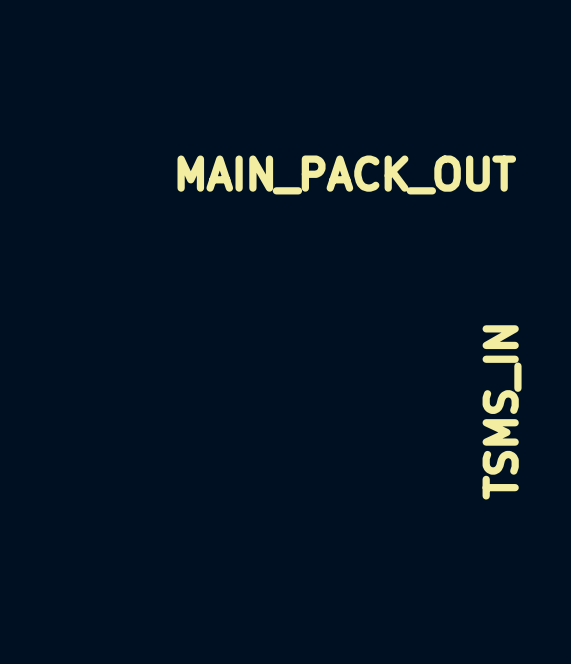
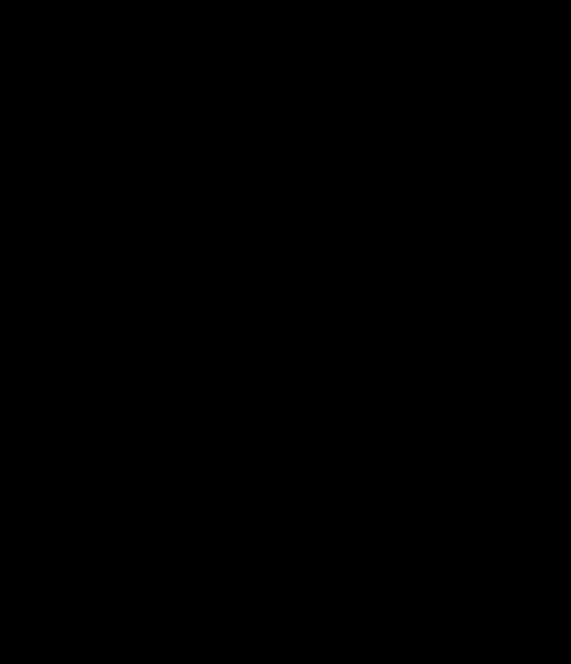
text: MAIN_PACK_OUT (346, 174) -> none
text: TSMS_IN (502, 412) -> none

